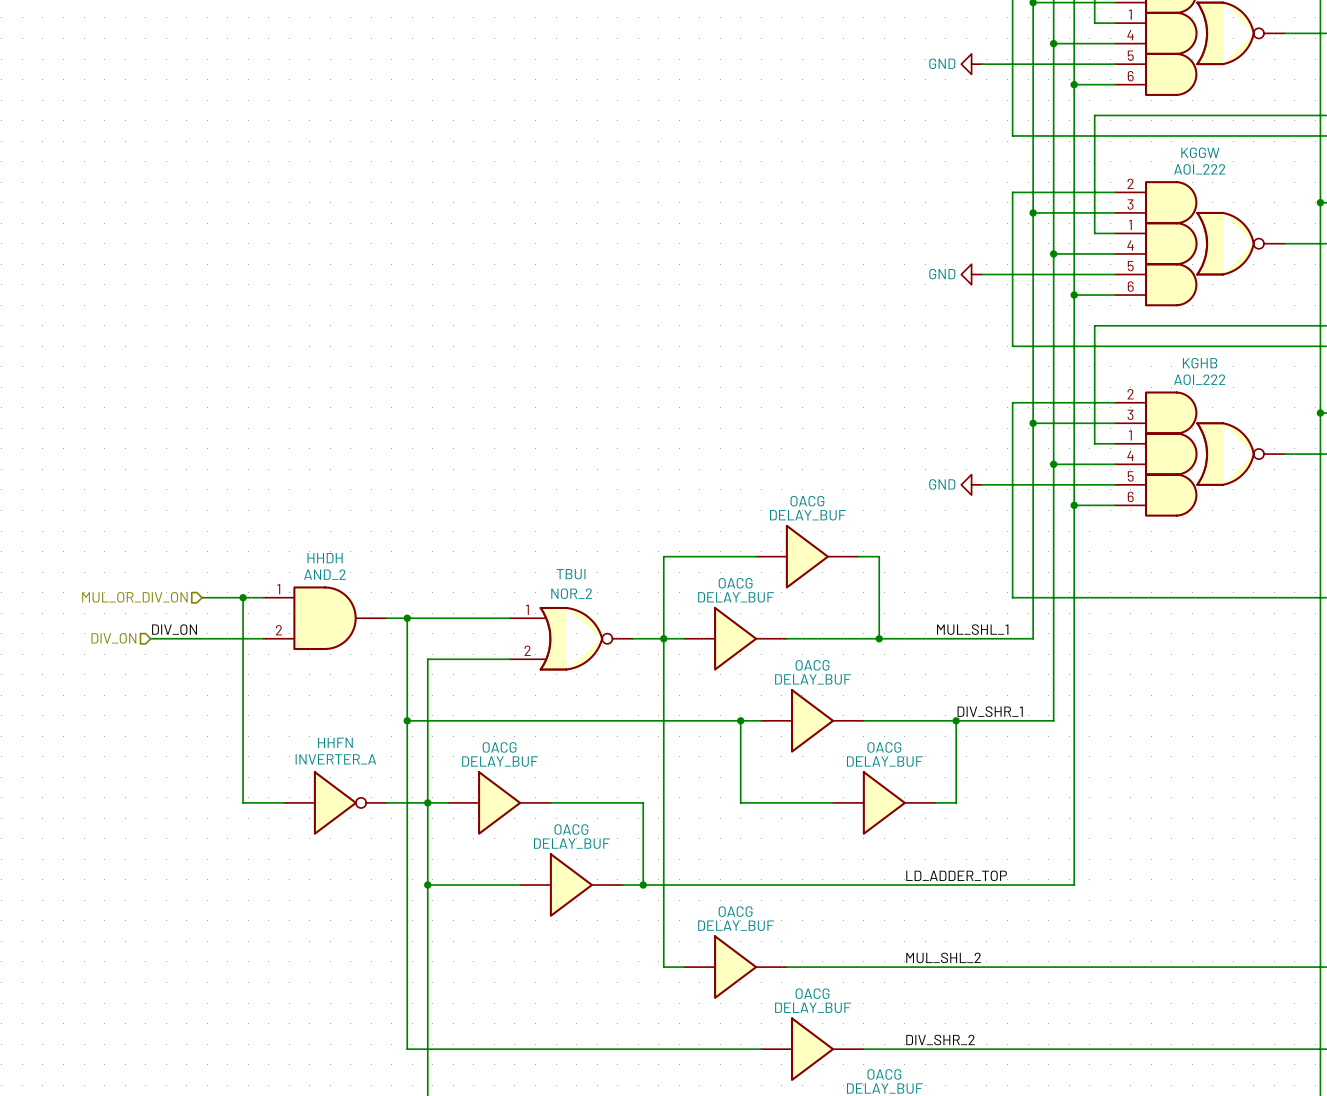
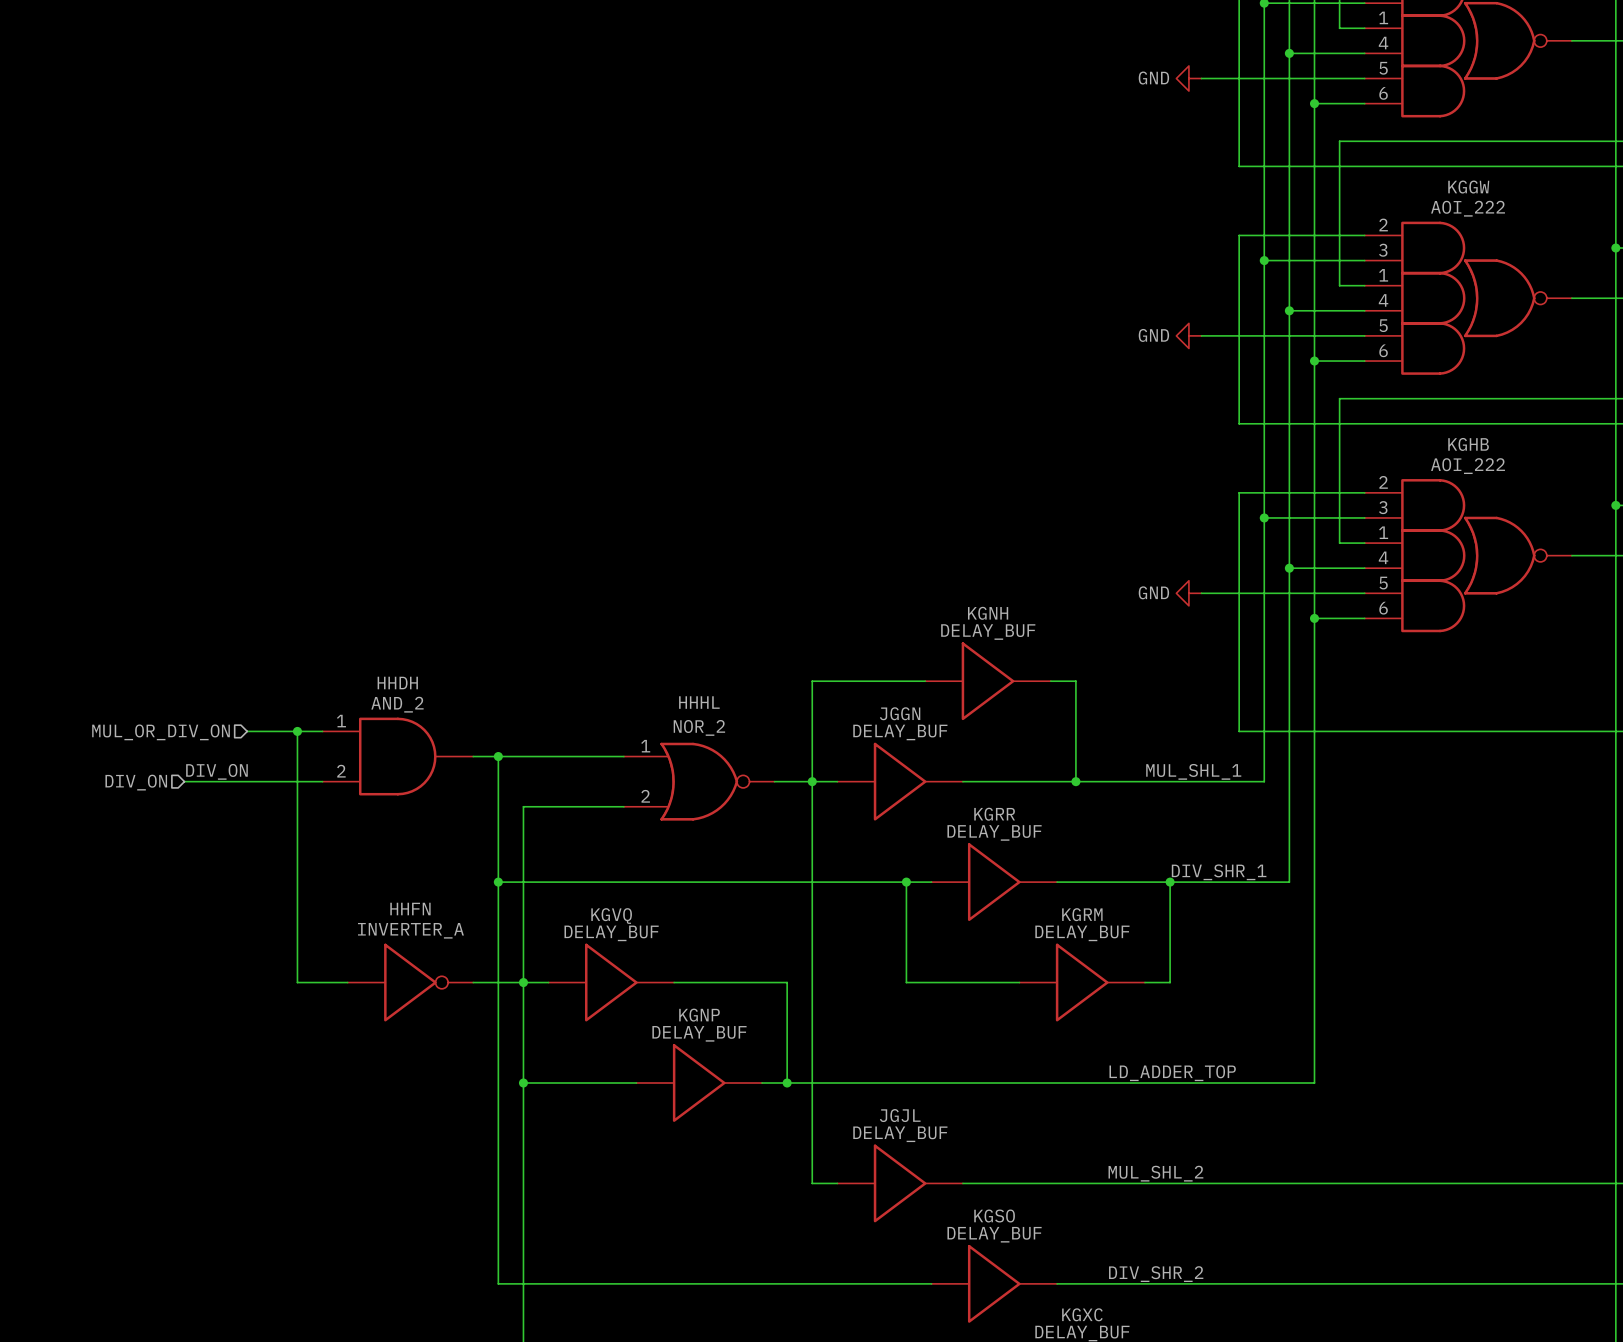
OACG name: OACG (807, 501) -> KGNH (988, 613)
TBUI name: TBUI (571, 574) -> HHHL (699, 702)
OACG name: OACG (735, 583) -> JGGN (900, 713)
OACG name: OACG (812, 665) -> KGRR (994, 814)
OACG name: OACG (499, 747) -> KGVQ (611, 916)
OACG name: OACG (884, 747) -> KGRM (1082, 914)
OACG name: OACG (571, 829) -> KGNP (699, 1015)
OACG name: OACG (735, 911) -> JGJL (900, 1115)
OACG name: OACG (812, 993) -> KGSO (994, 1216)
OACG name: OACG (884, 1074) -> KGXC (1082, 1314)

